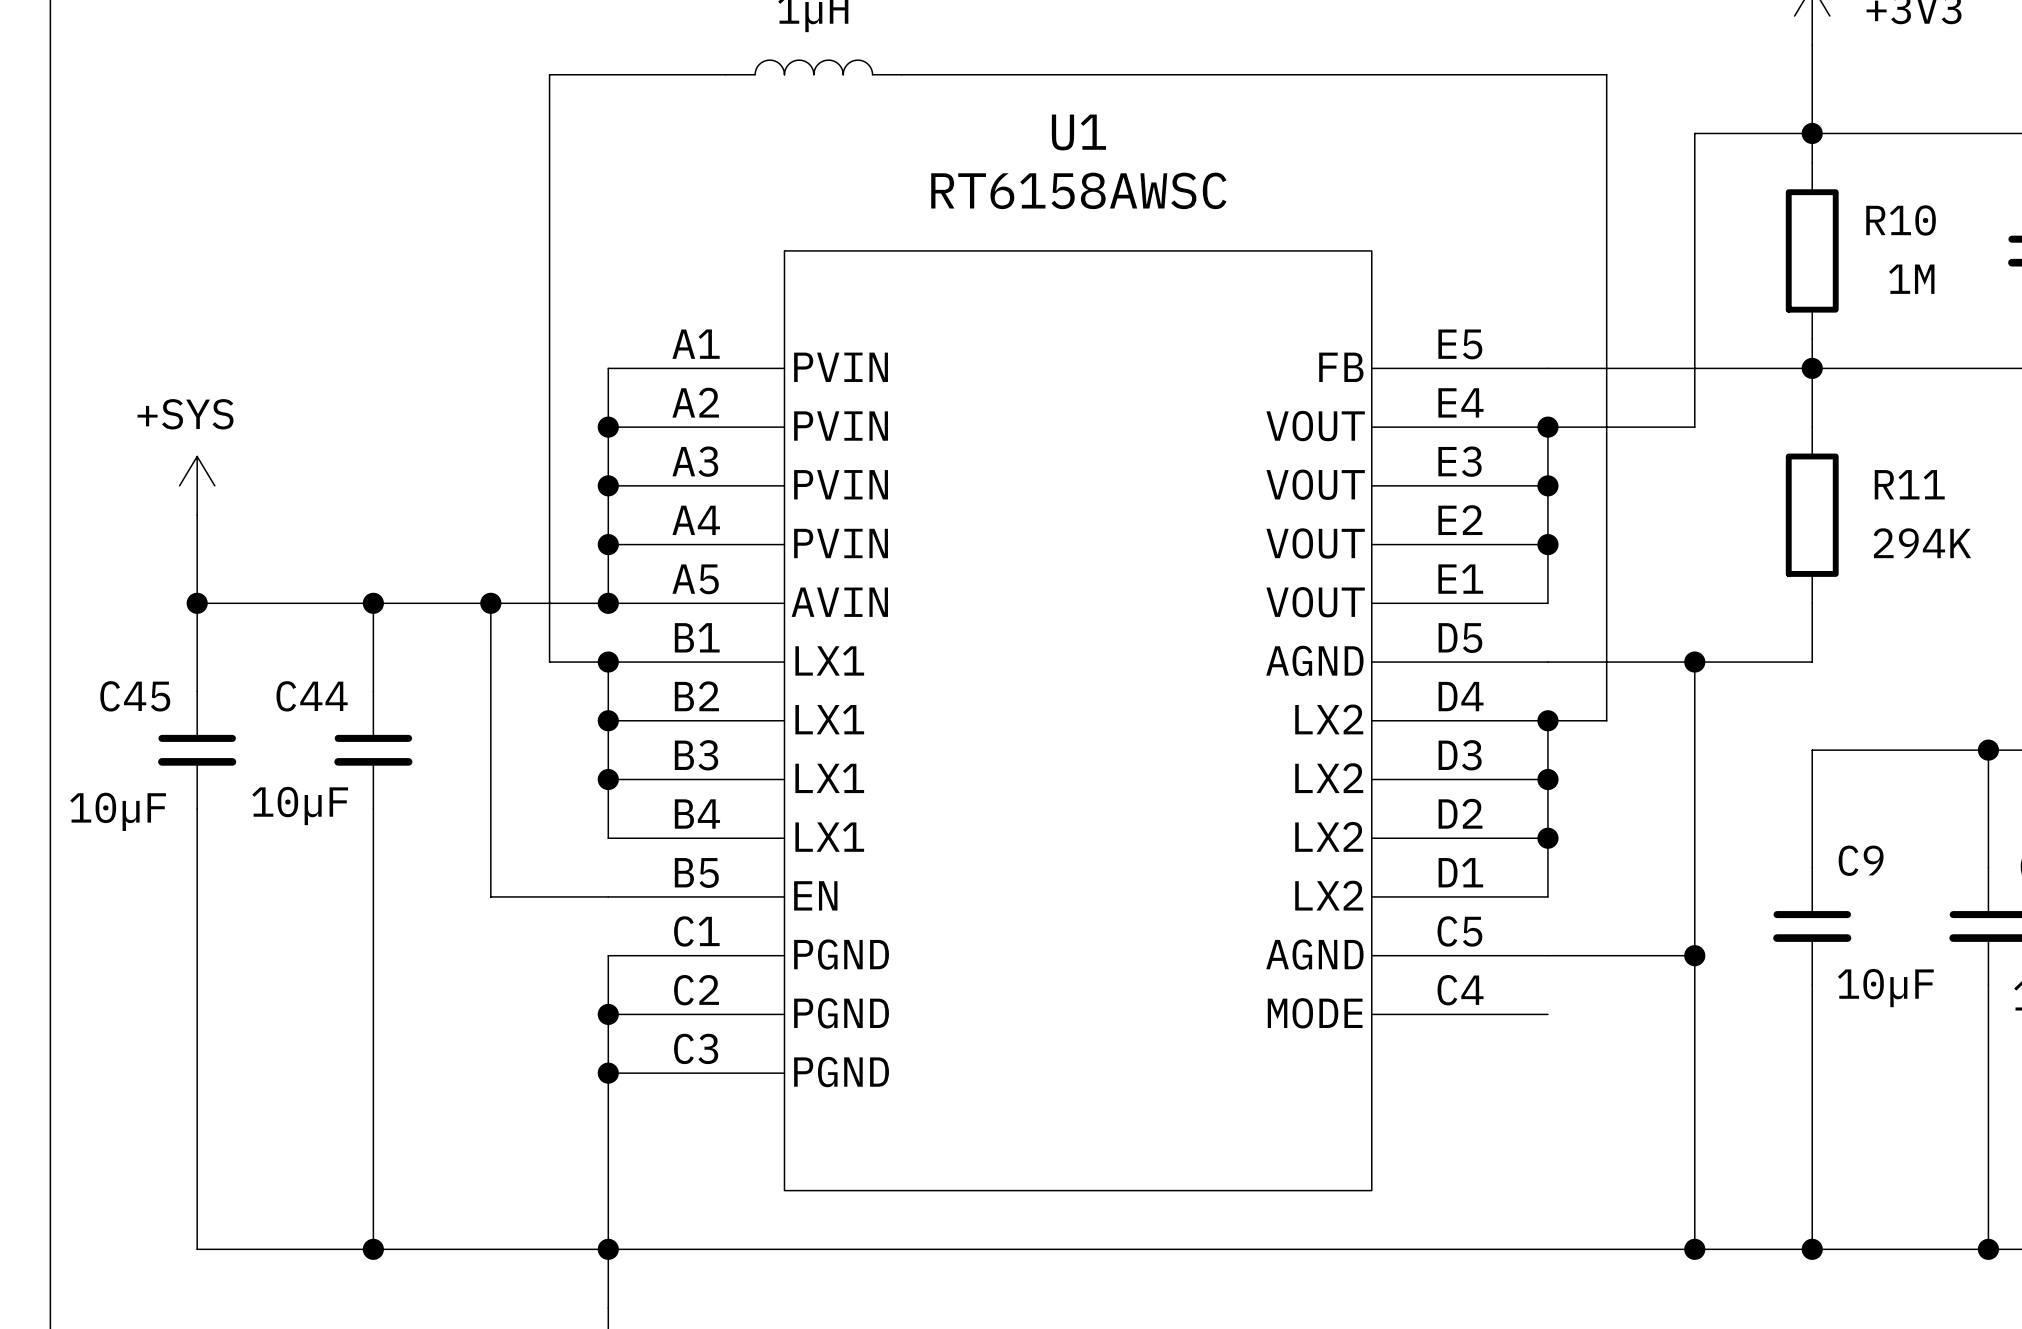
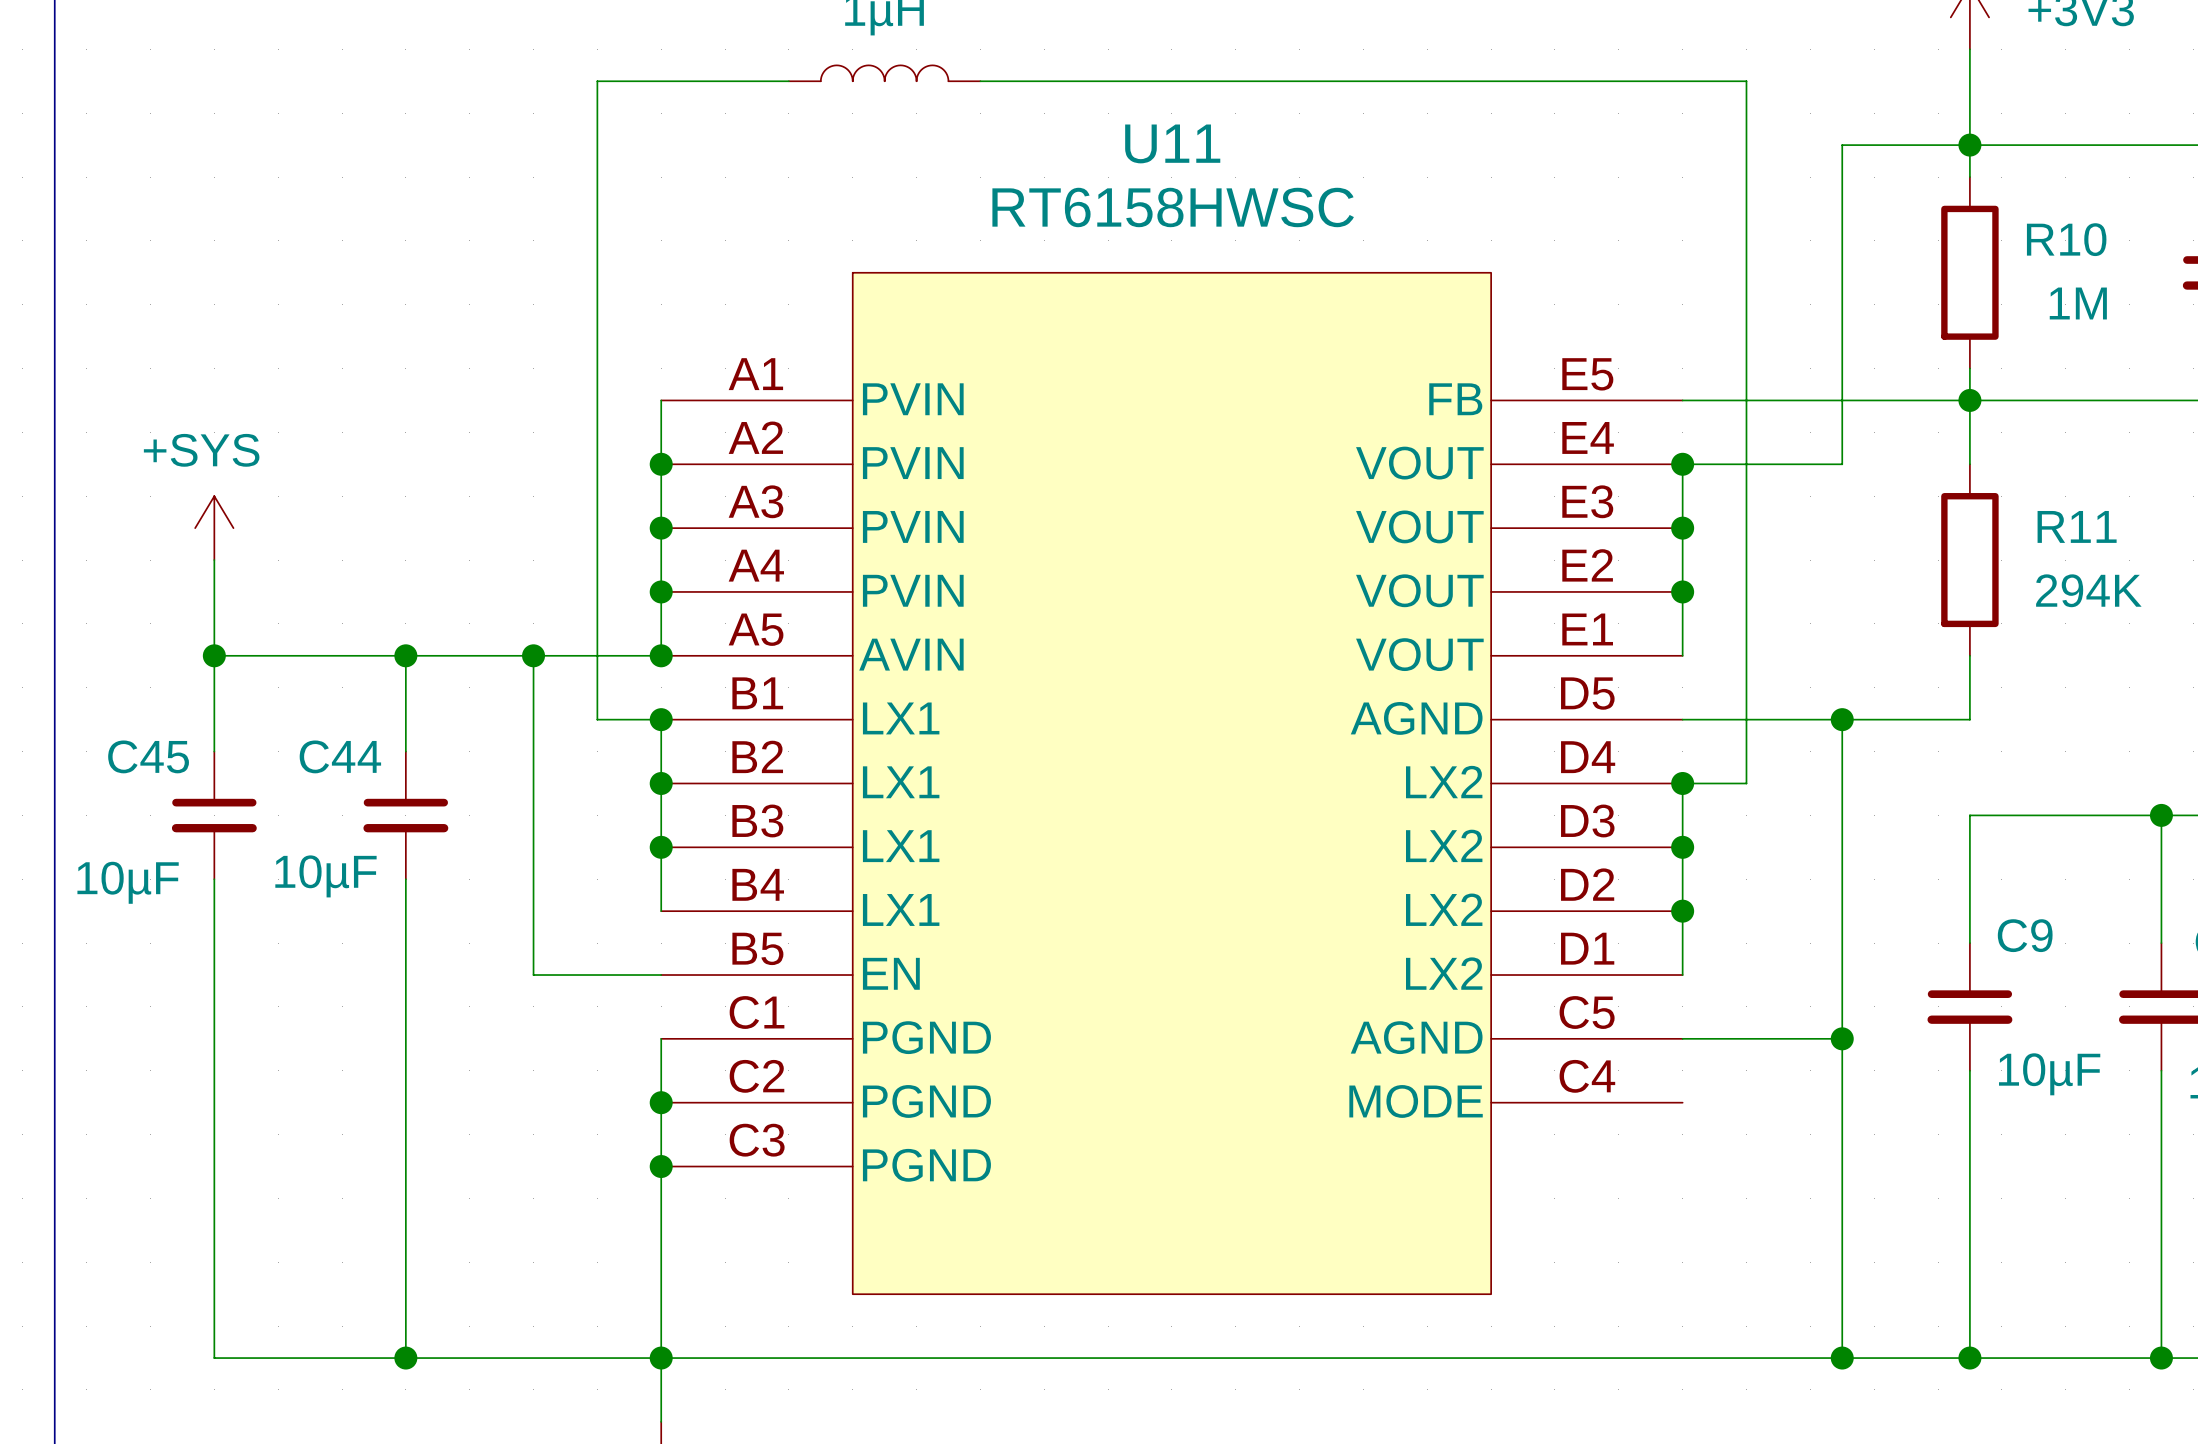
U1 name: U1 (1078, 132) -> U11 (1172, 143)
U1 value: RT6158AWSC (1078, 190) -> RT6158HWSC (1173, 207)

